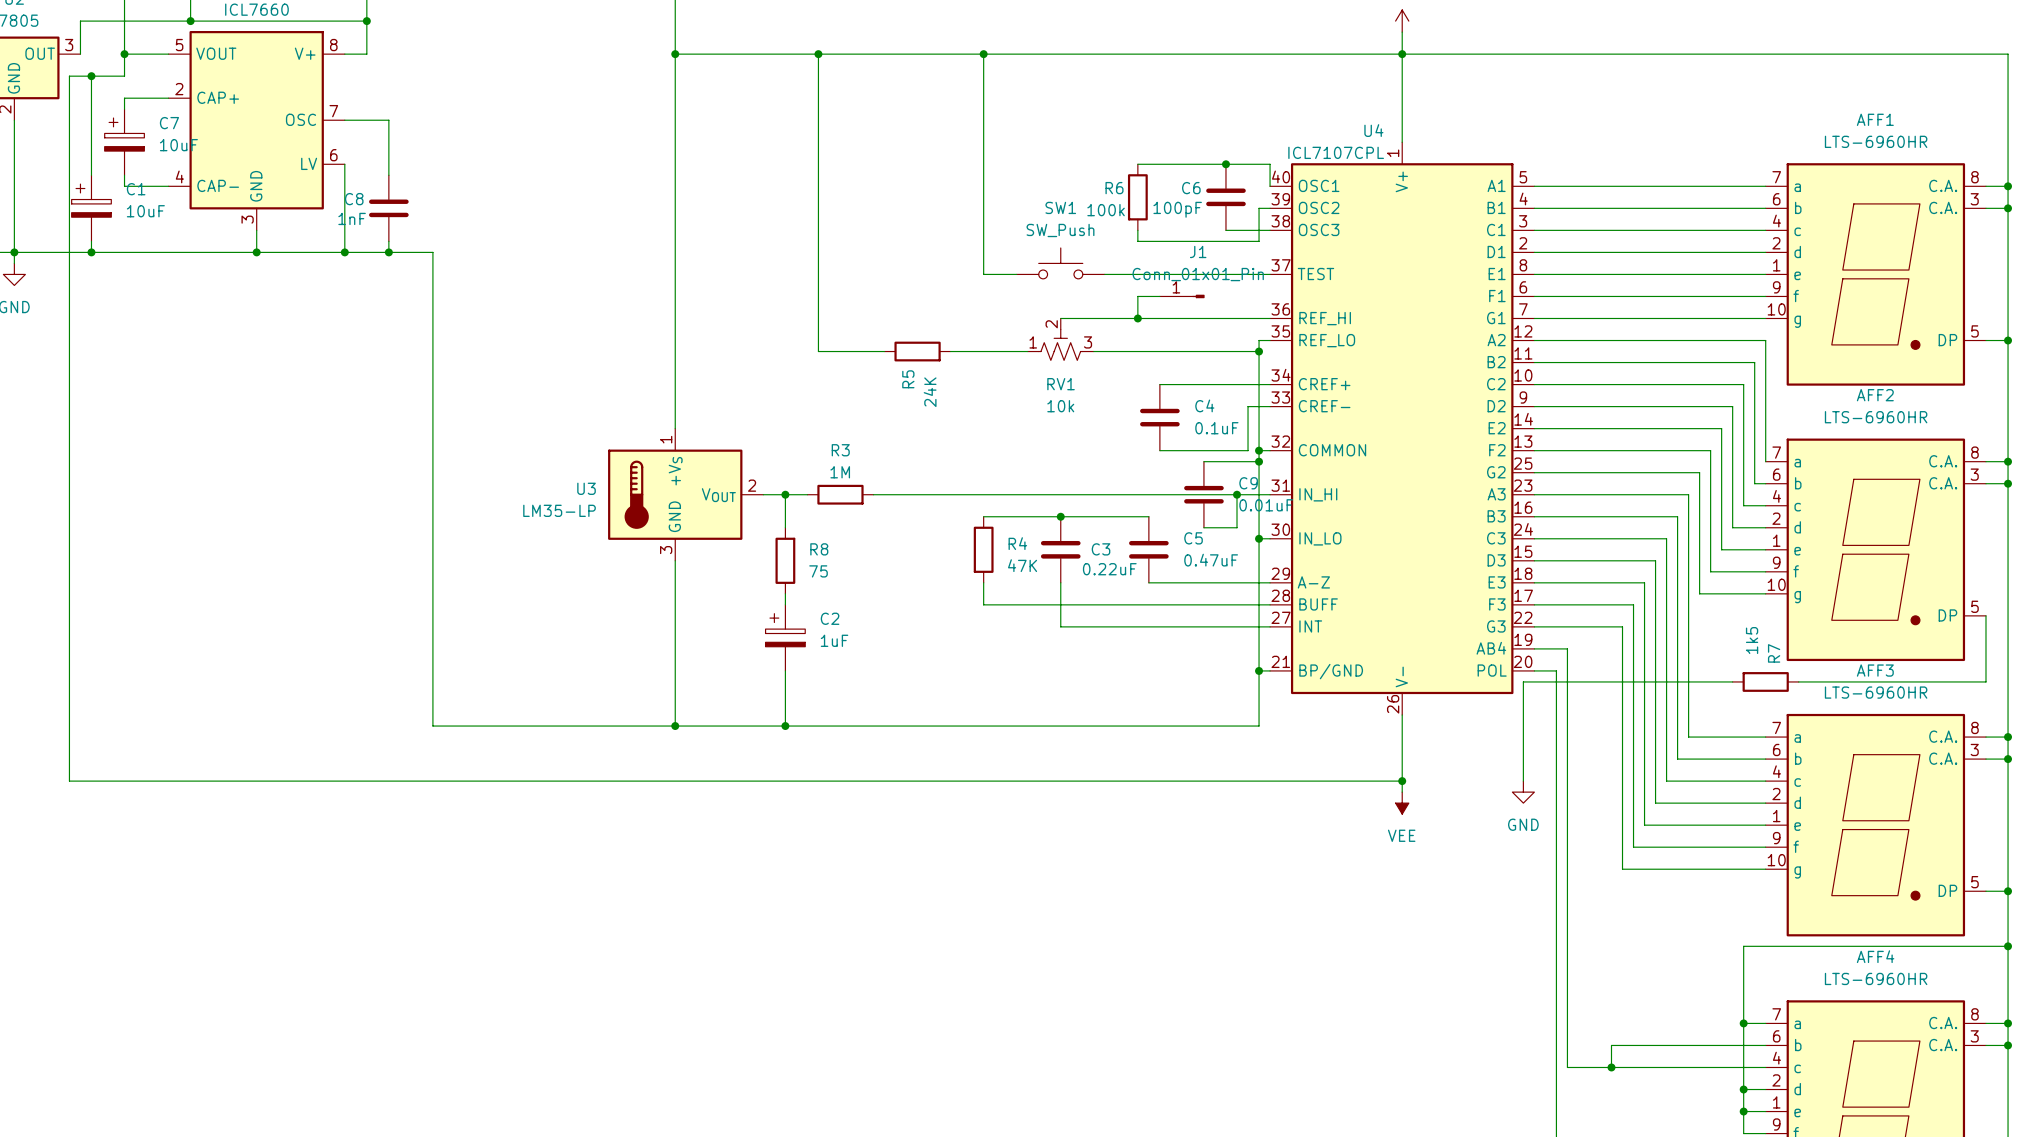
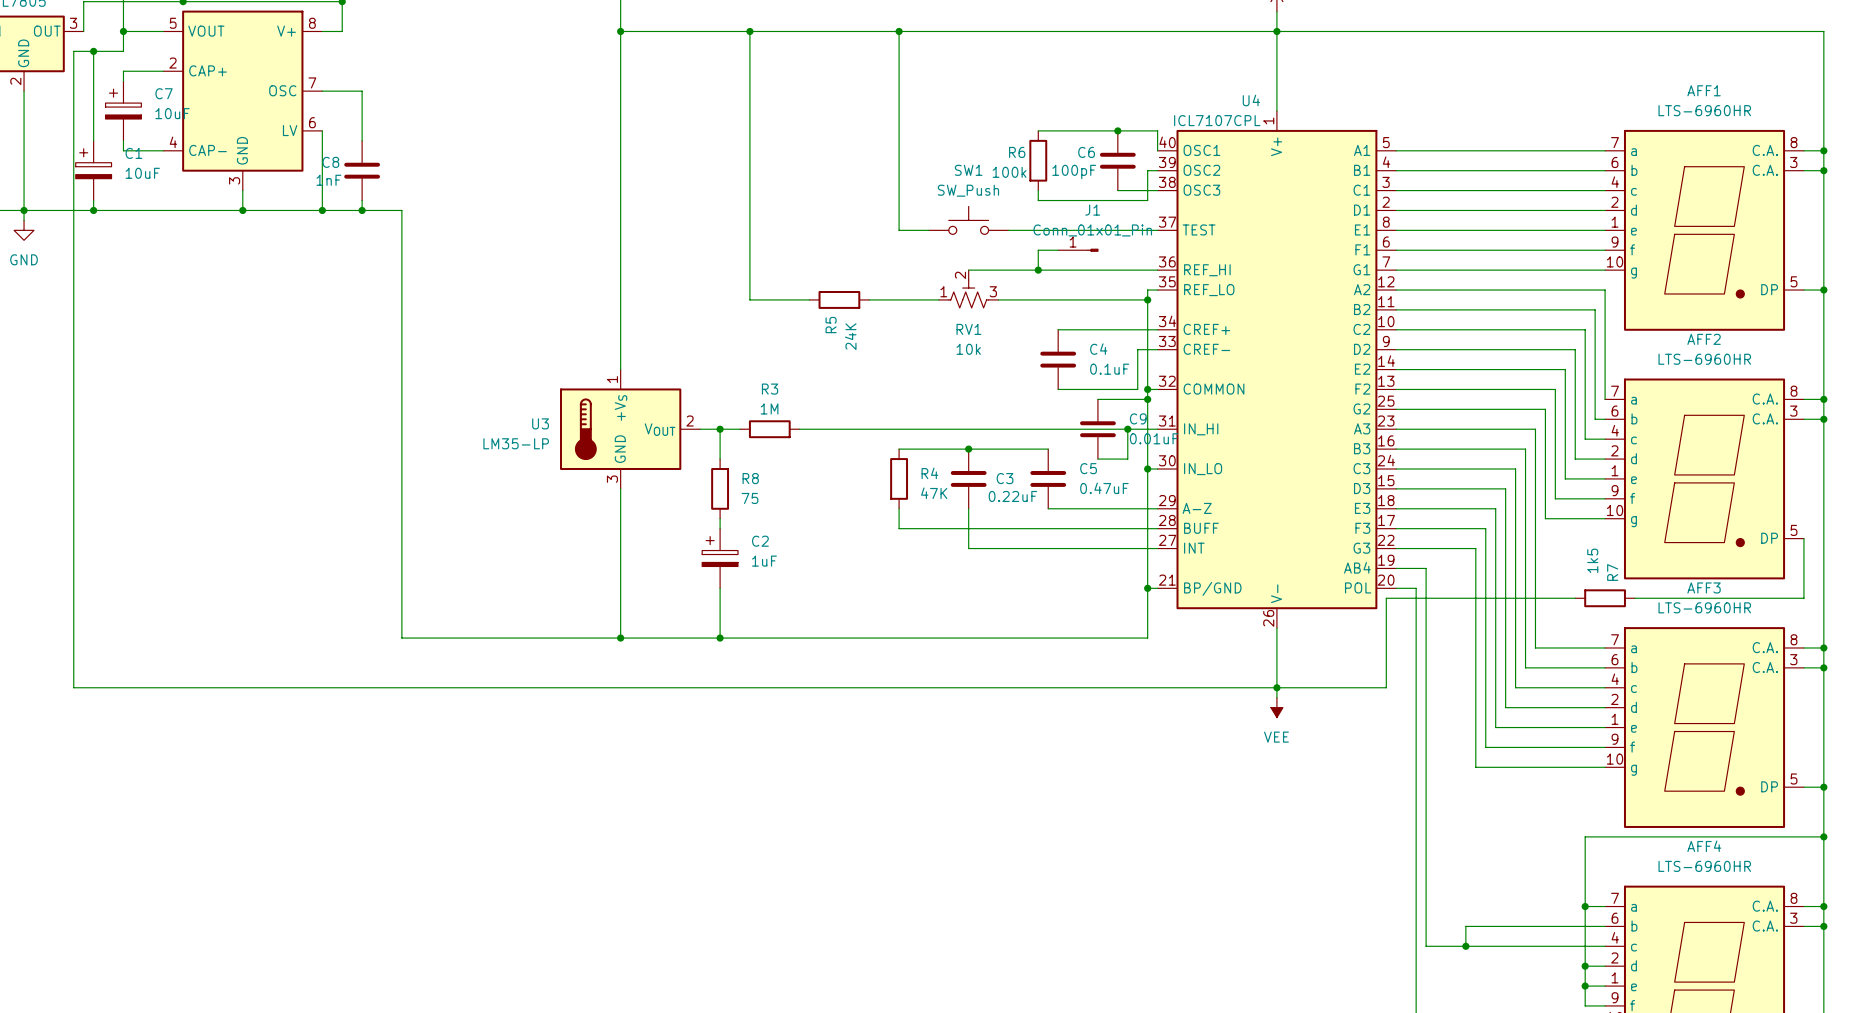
wire: none -> (1276, 687) (1386, 687)
power symbol: GND (1523, 792) -> none

